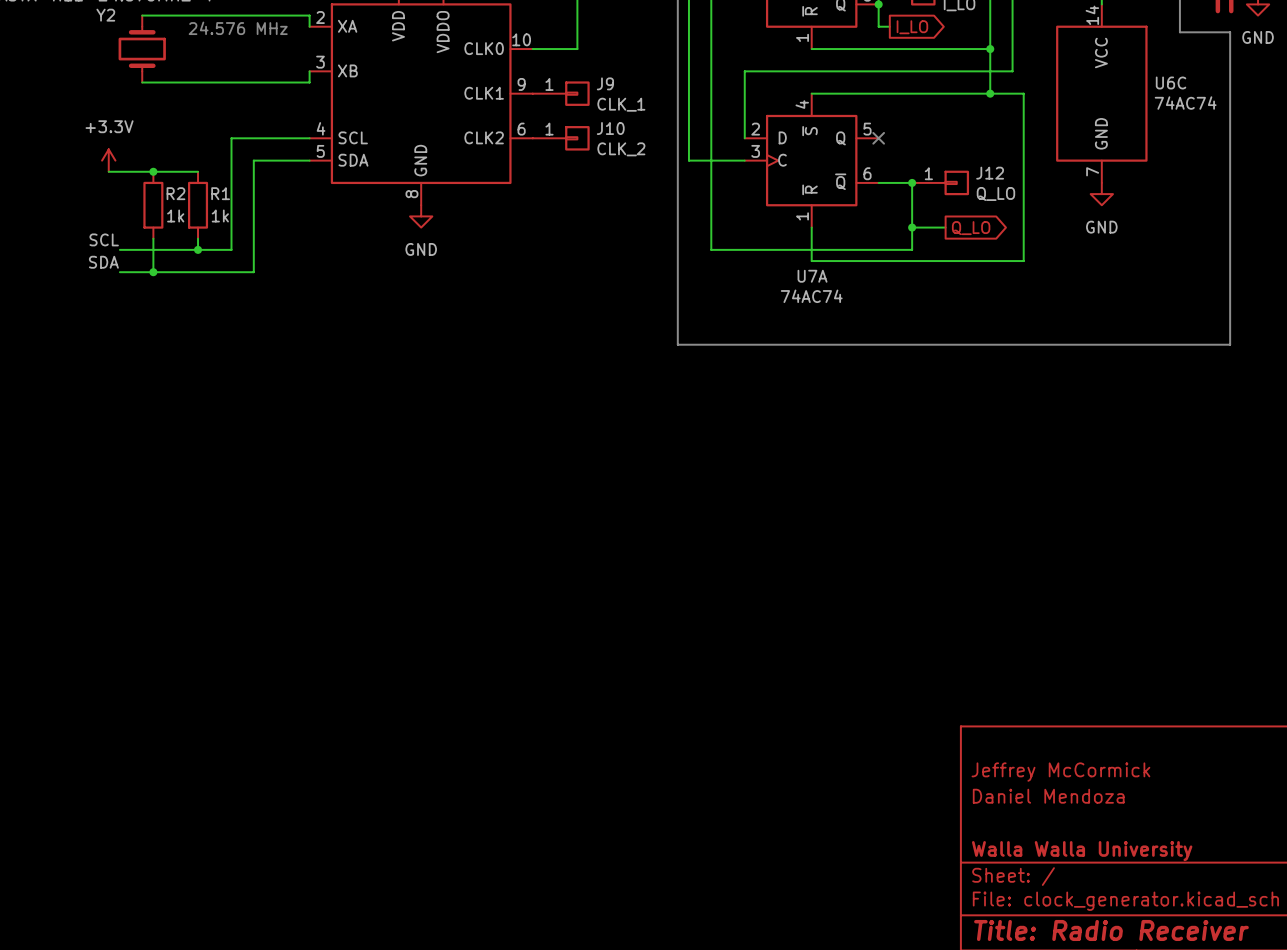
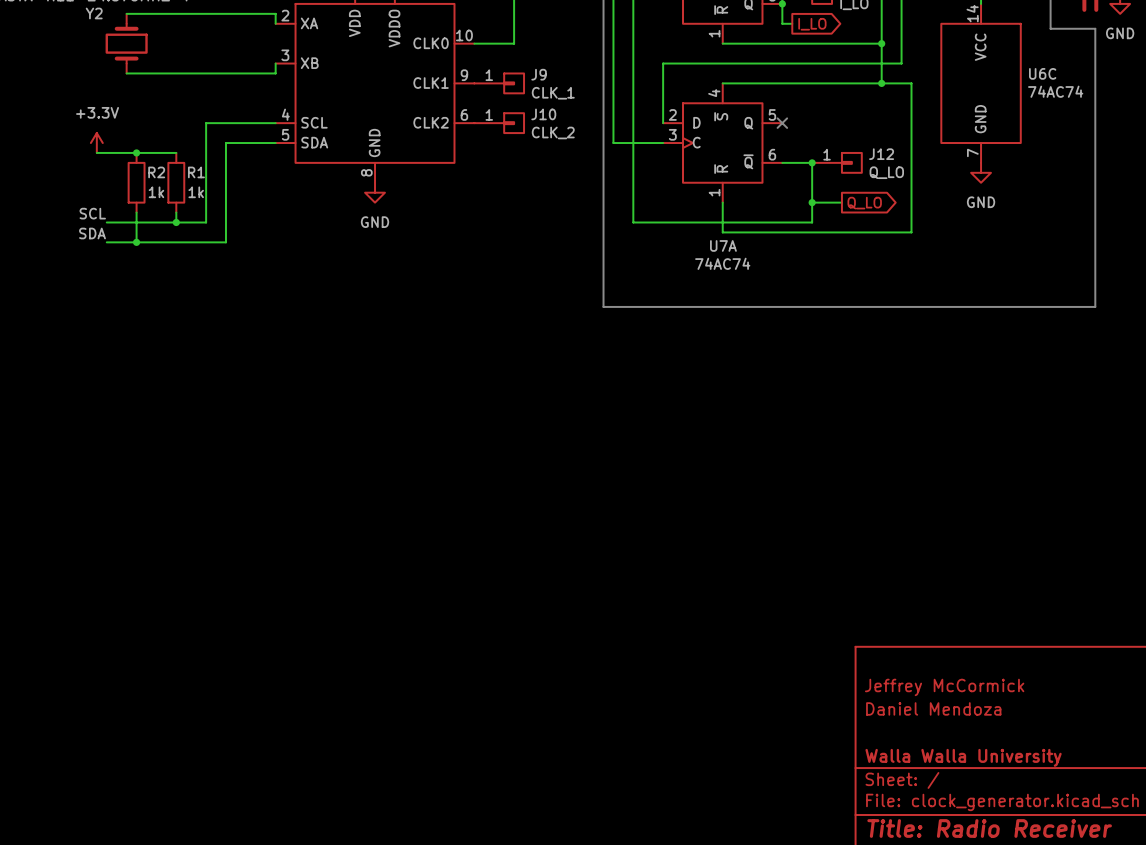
text: 24.576 MHz (238, 28) -> none

